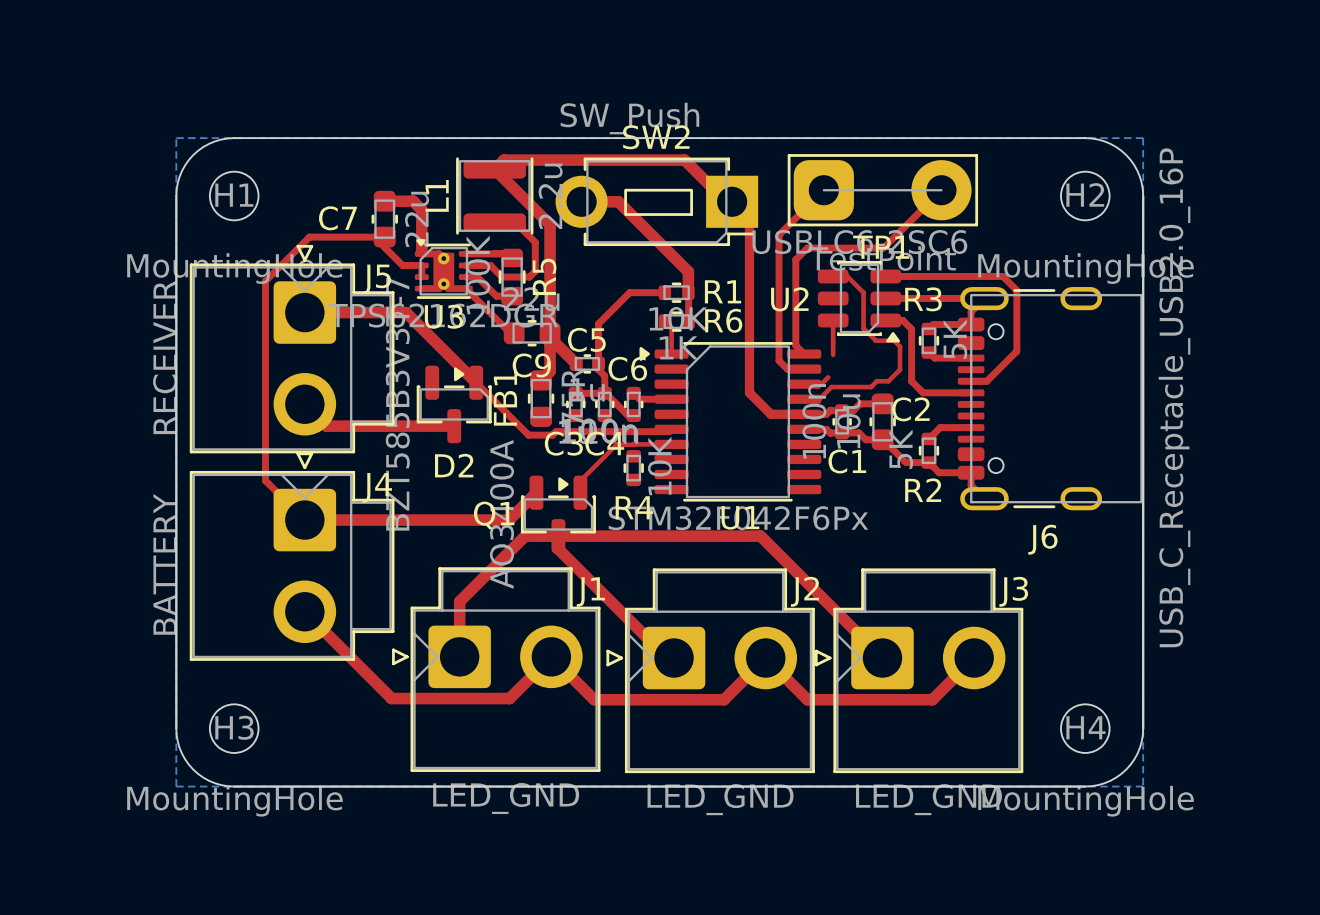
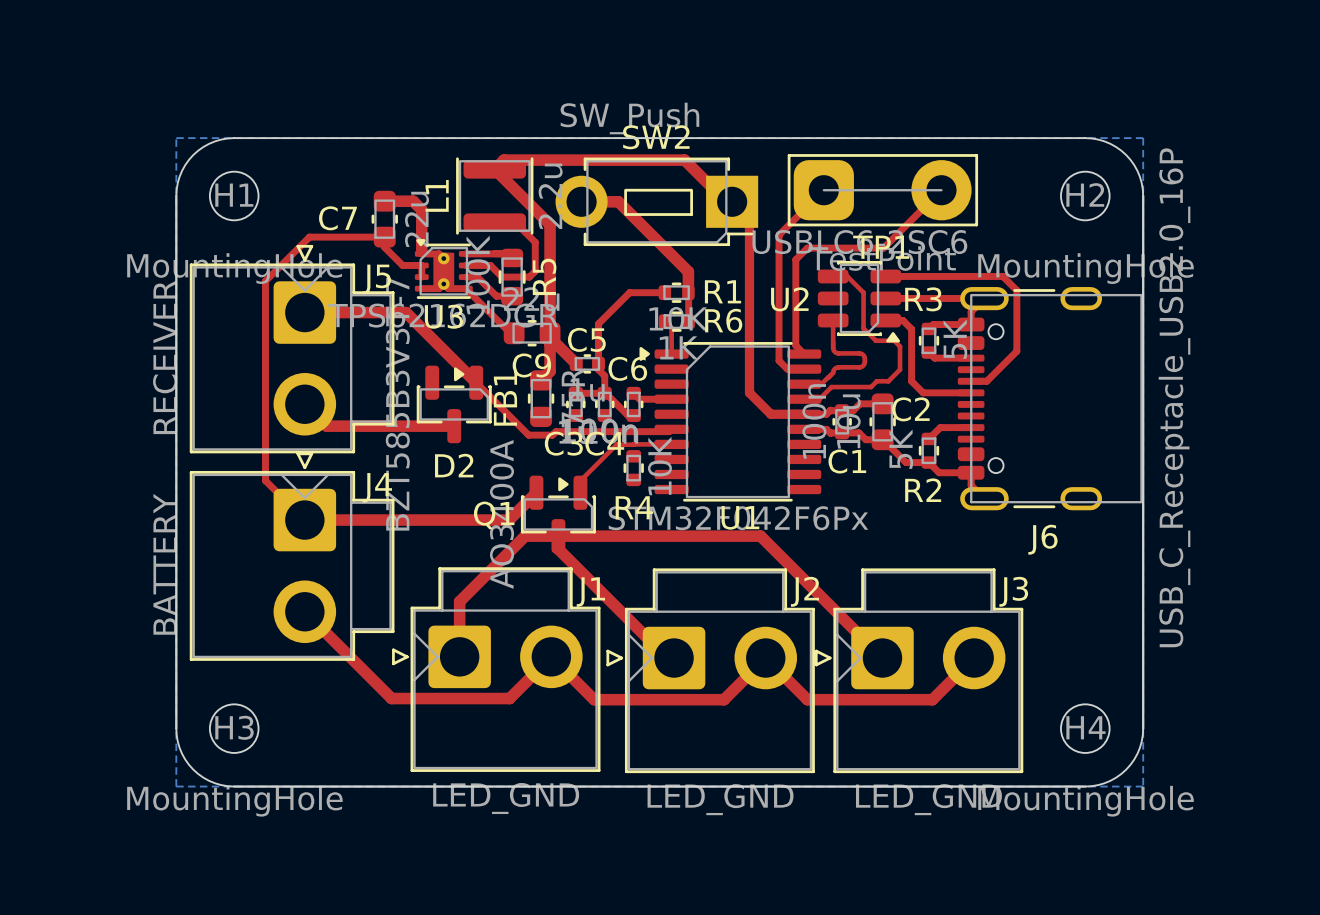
top track: (833, 347) (833, 354) -> (833, 347) (837, 353) (861, 353) (864, 357) (864, 362) (860, 367) (836, 367) (828, 377)

